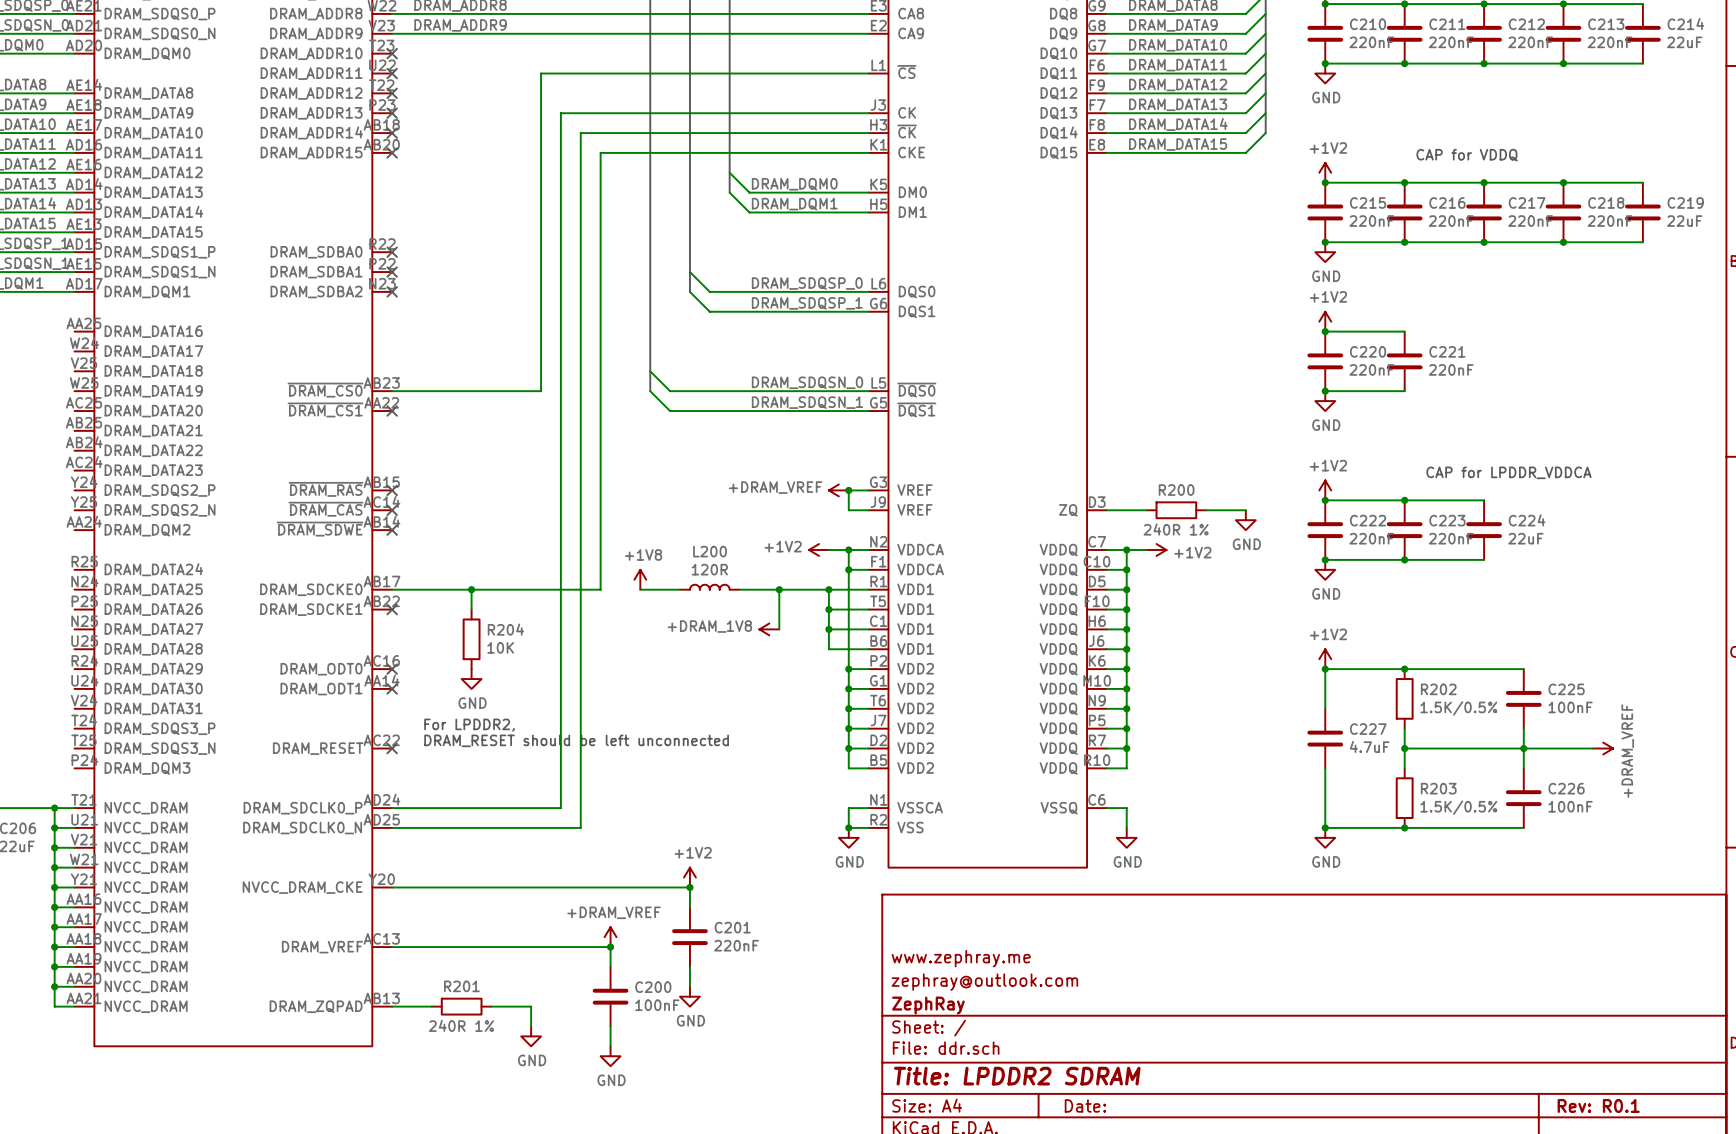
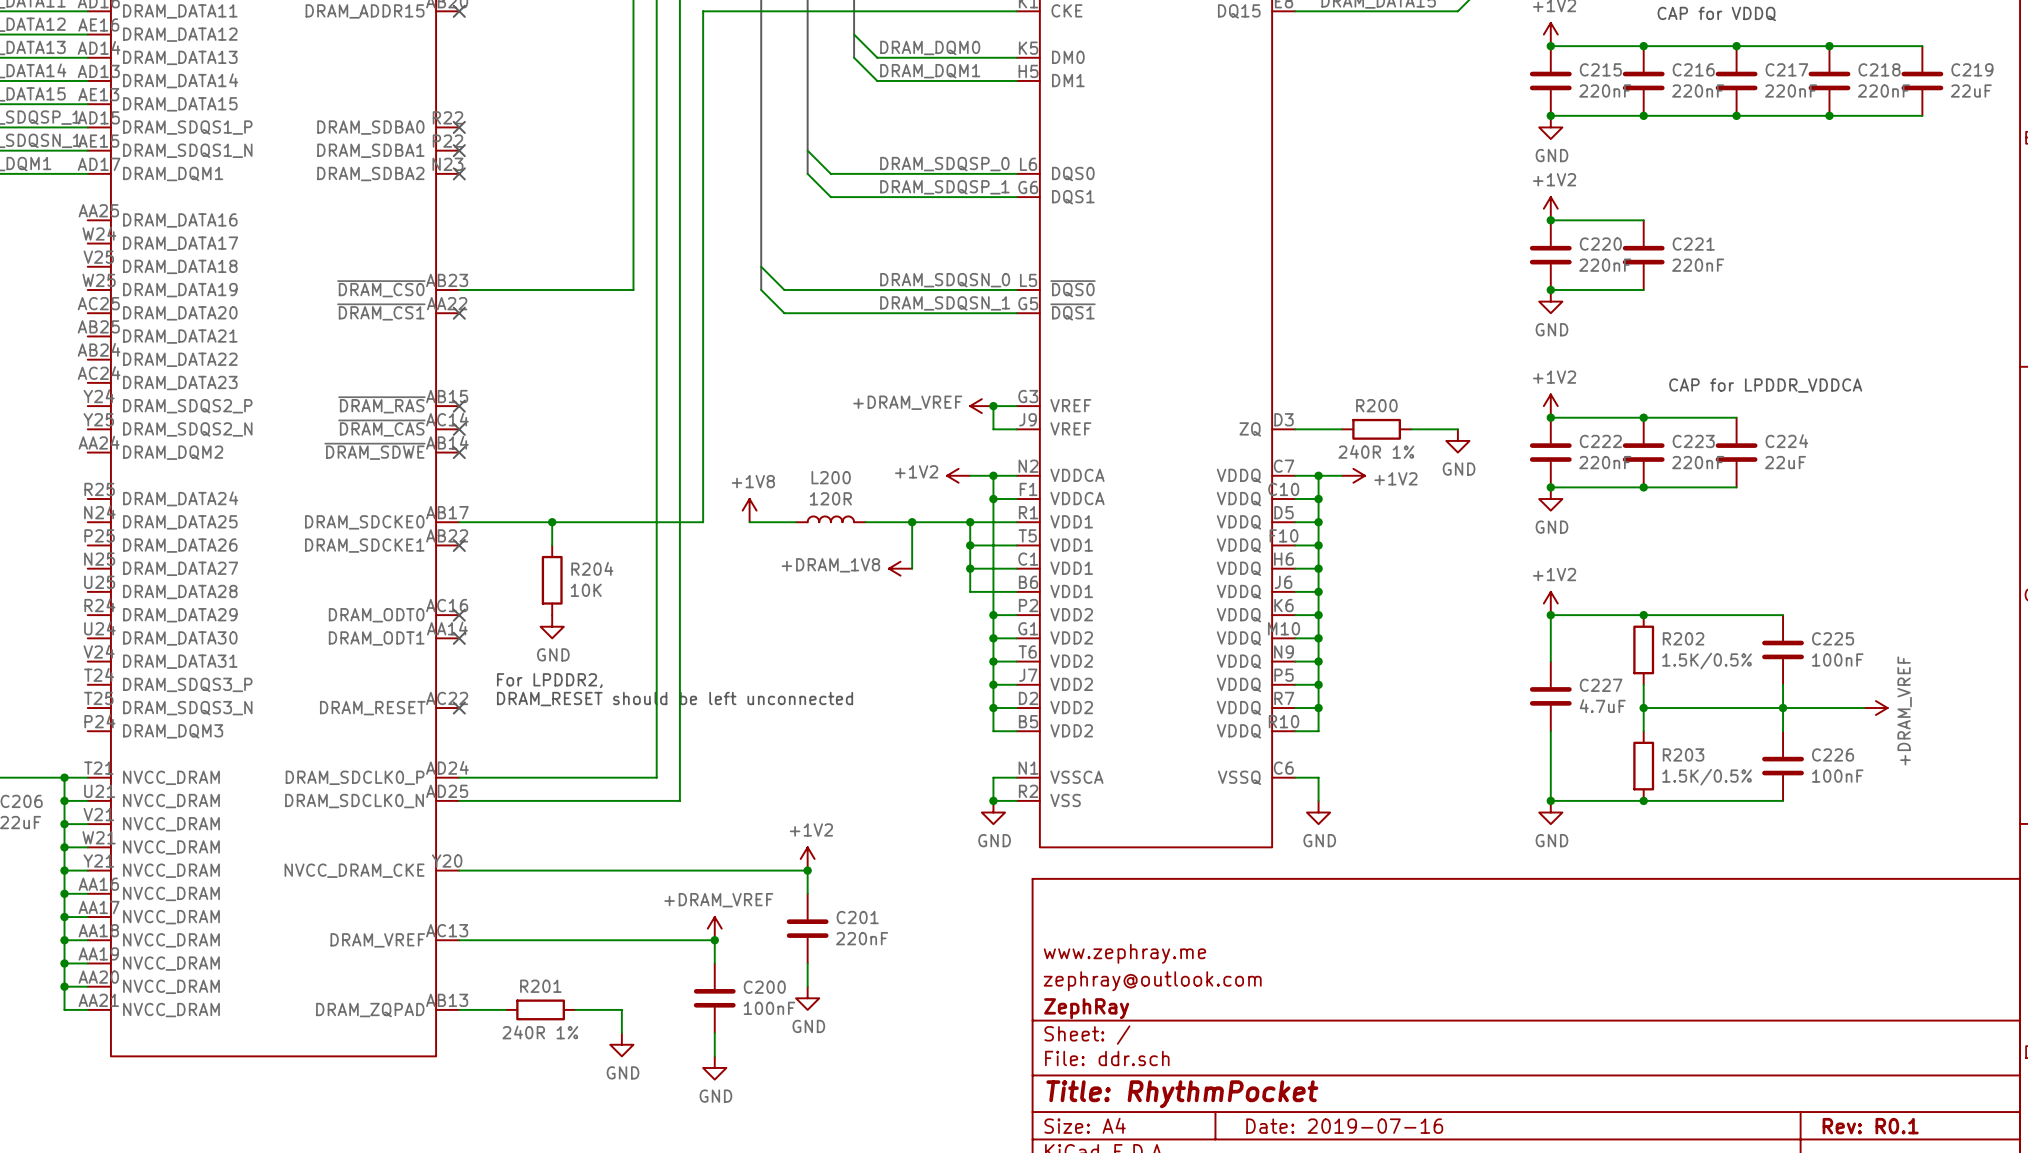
title block: Title: LPDDR2 SDRAM (1017, 1076) -> Title: RhythmPocket (1182, 1094)
title block: Date: (1085, 1105) -> Date: 2019-07-16 (1344, 1126)

